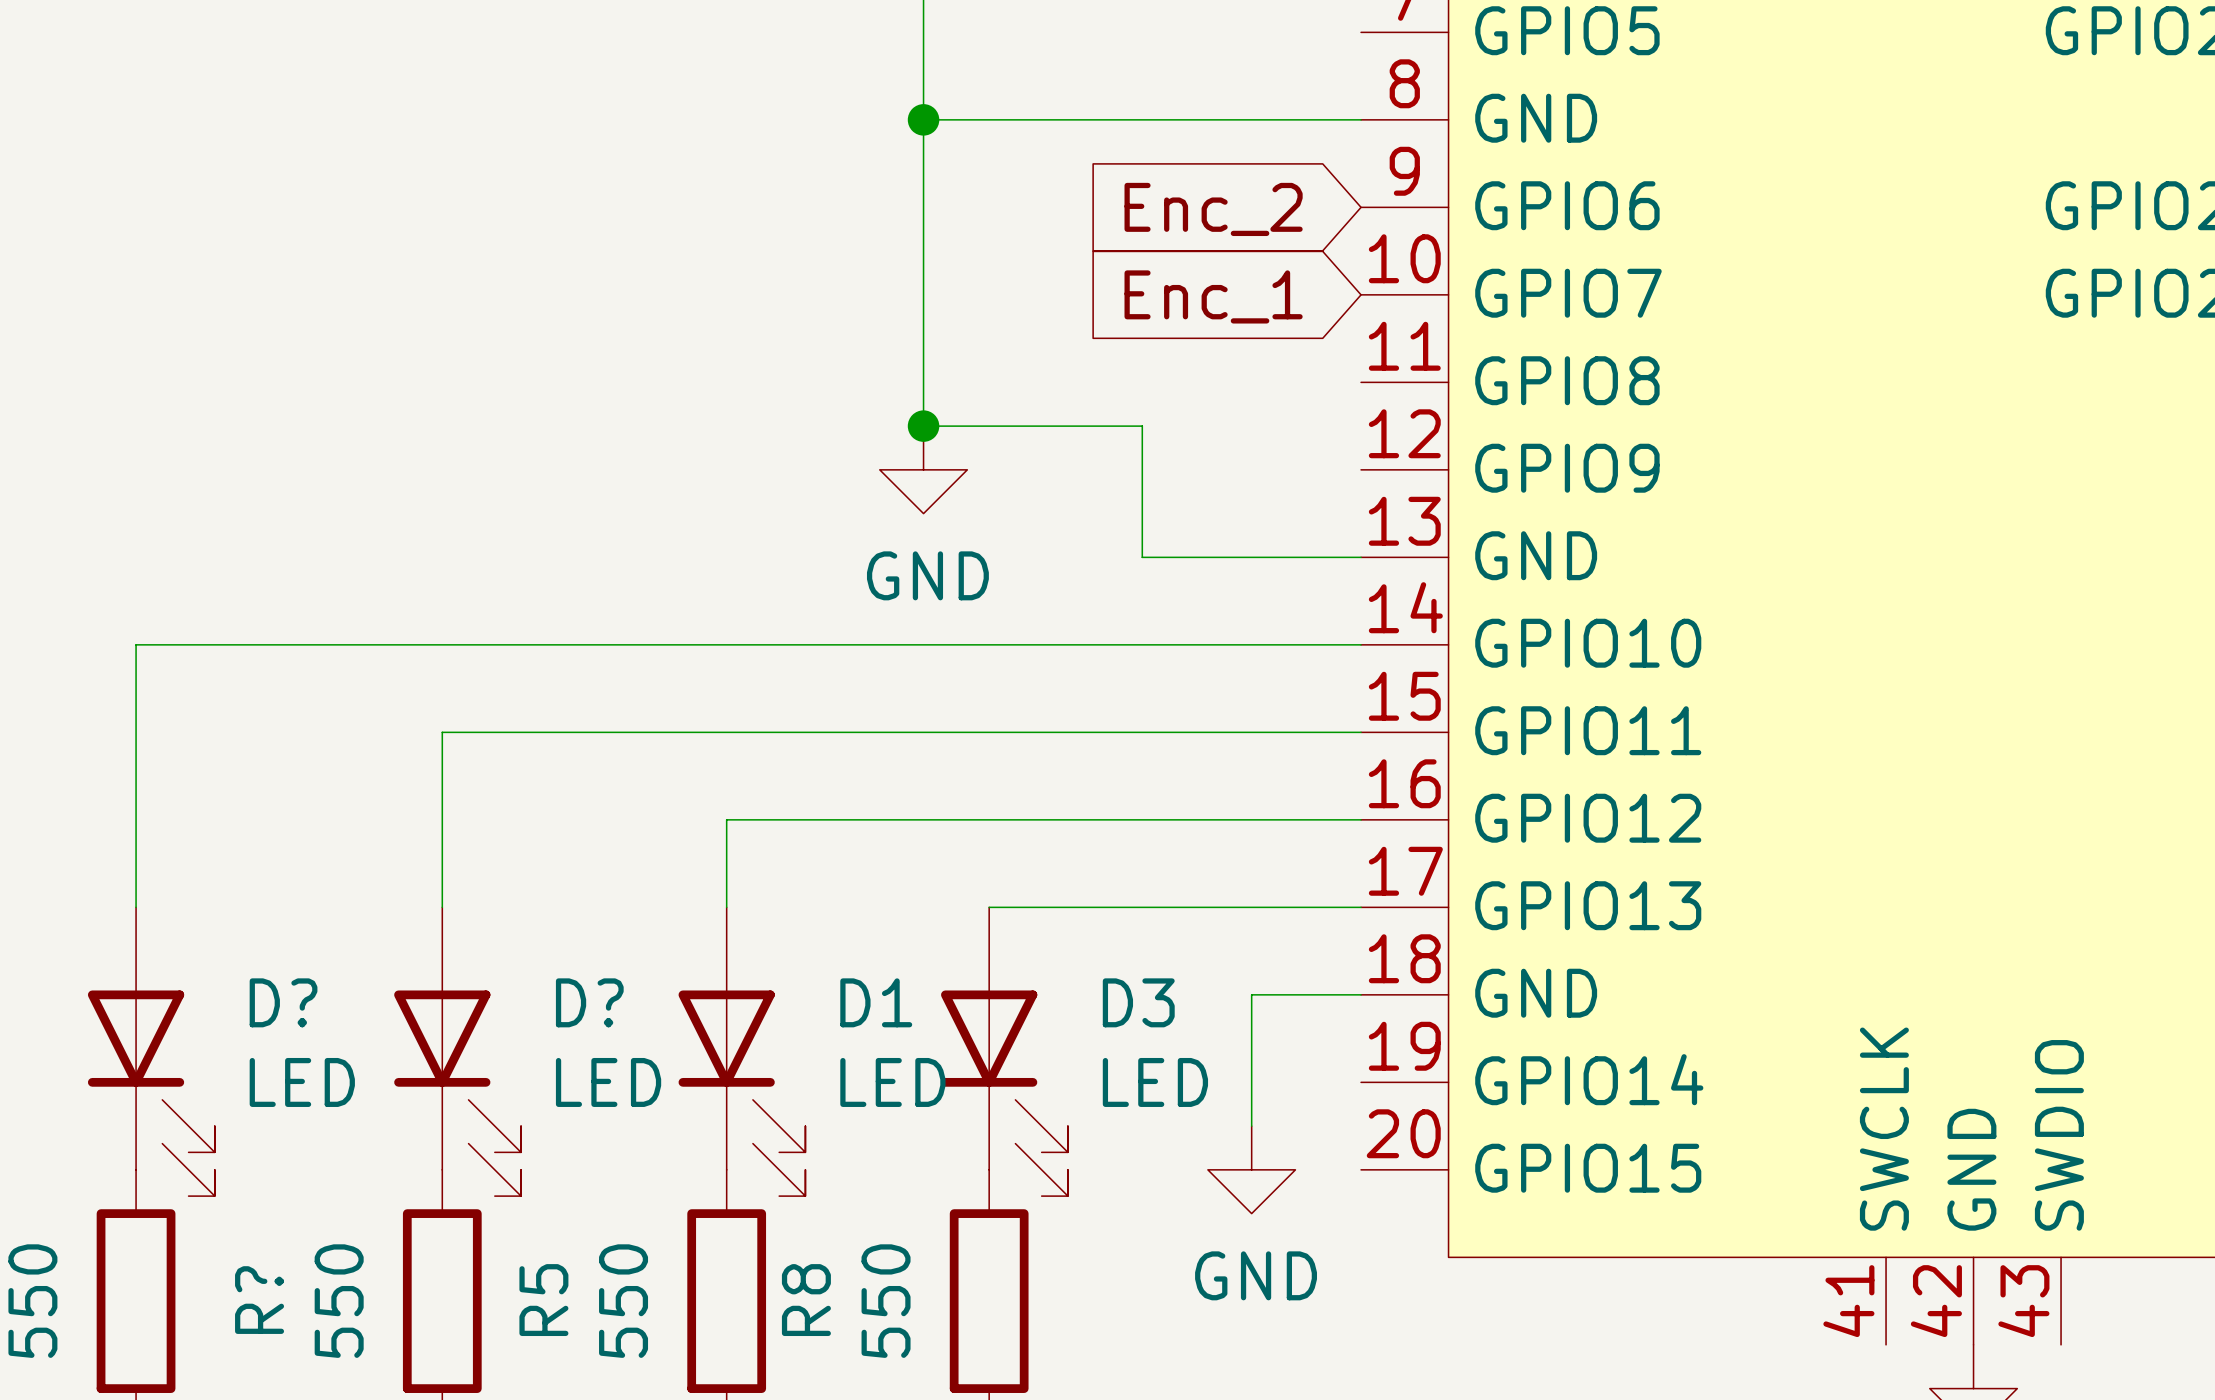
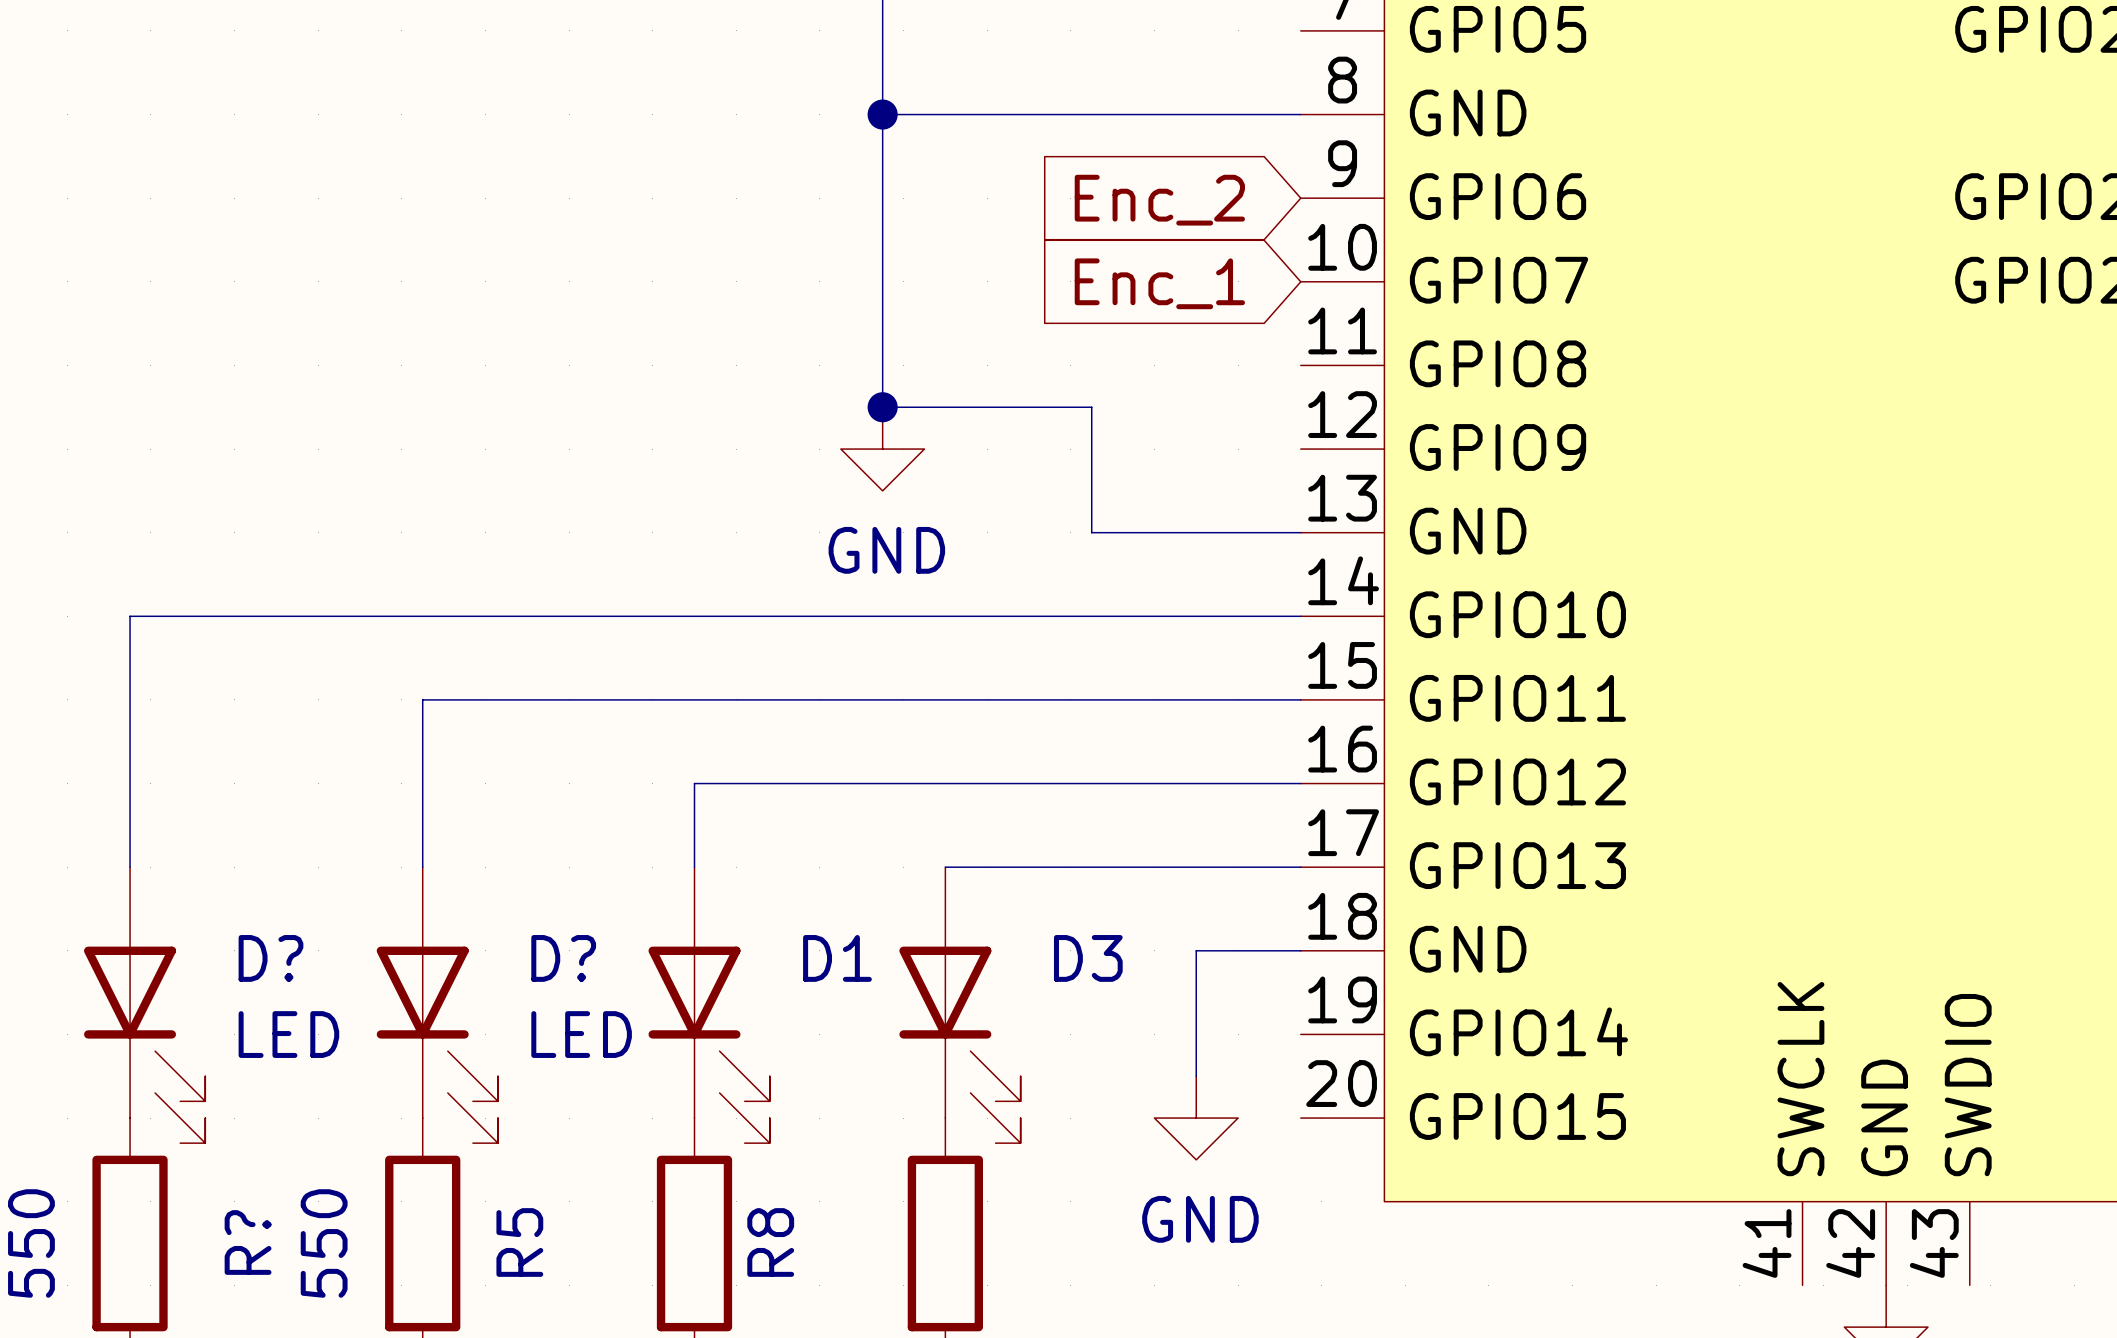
D1 value: LED (892, 1082) -> none
D3 value: LED (1155, 1082) -> none
R5 value: 550 (623, 1301) -> none
R8 value: 550 (886, 1301) -> none

